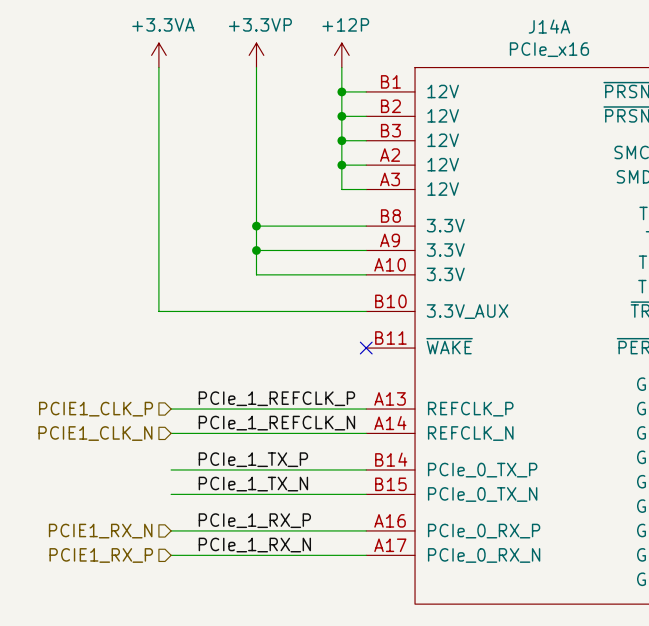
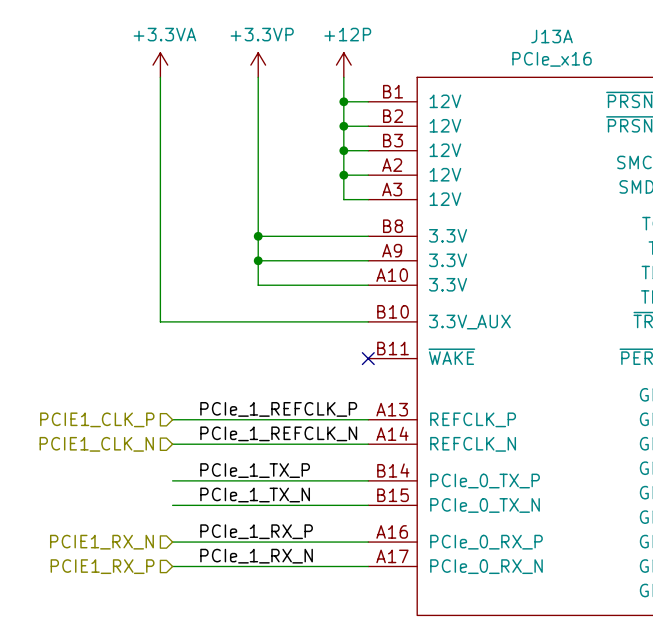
J14A name: J14A (549, 26) -> J13A (552, 36)

